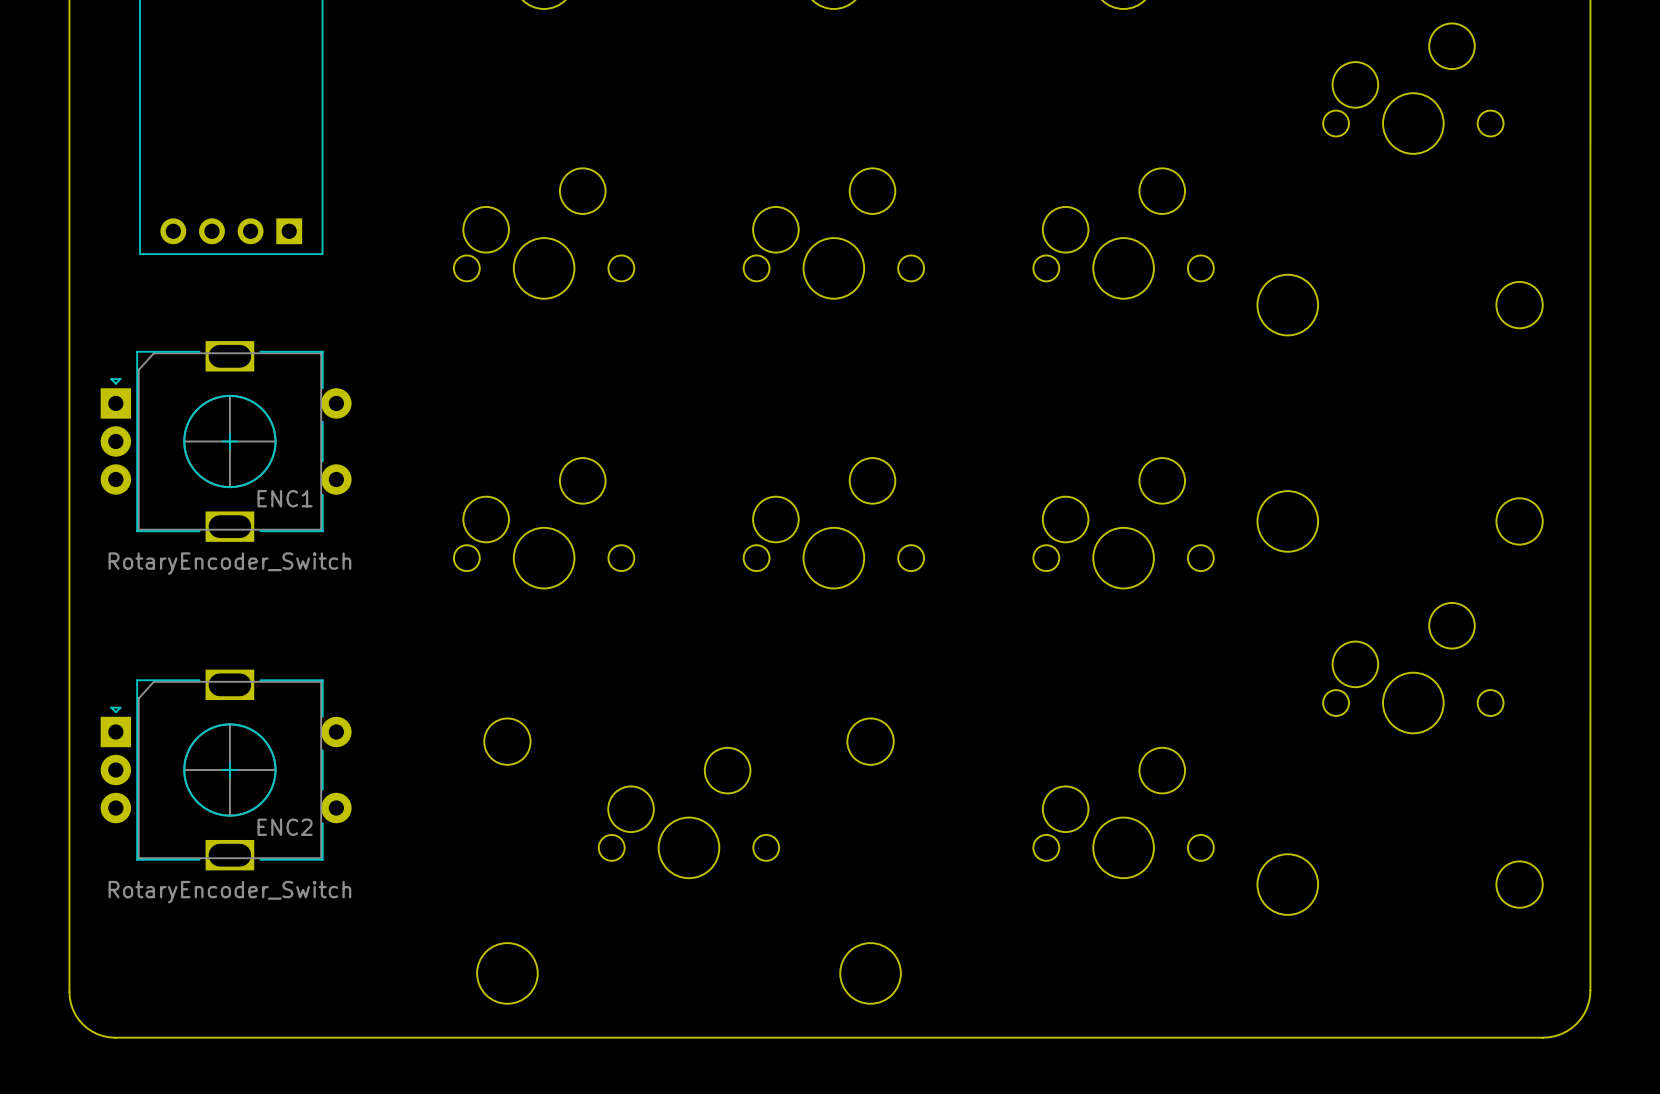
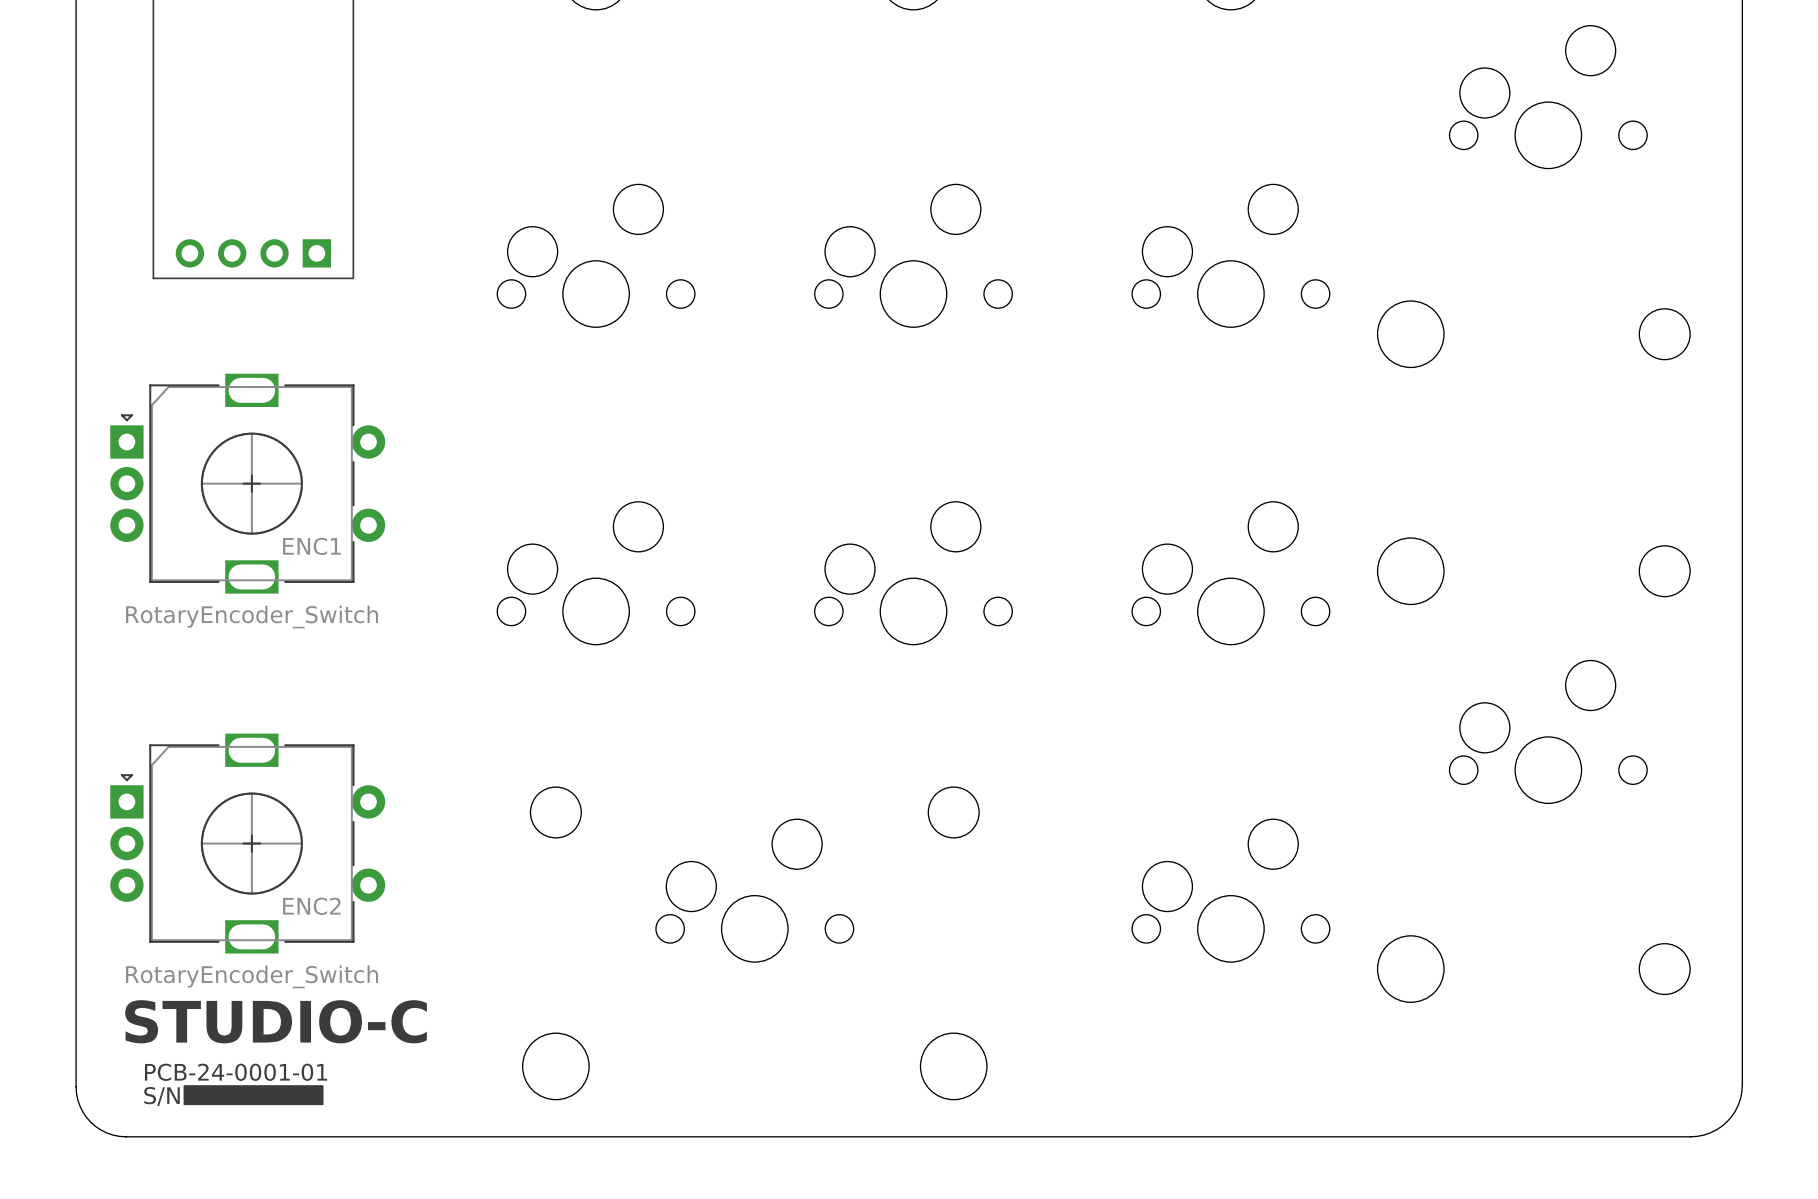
text: none -> STUDIO-C (276, 1021)
text: none -> PCB-24-0001-01 (236, 1072)
drawing: none -> [183, 1085, 324, 1106]
text: none -> S/N (162, 1096)

